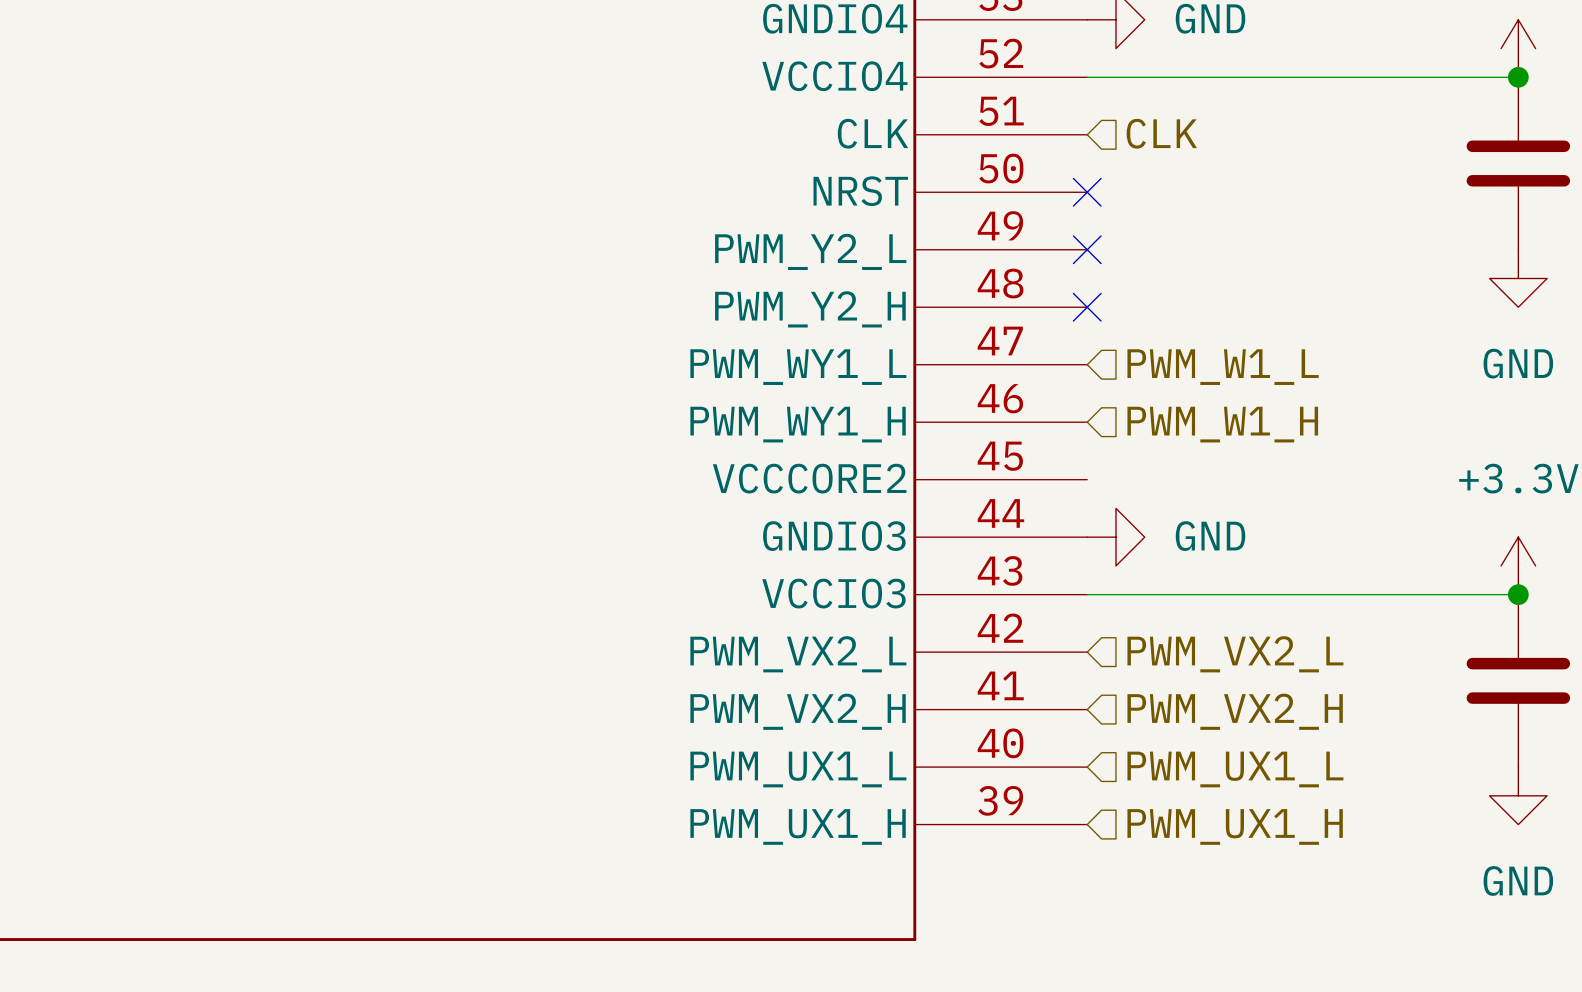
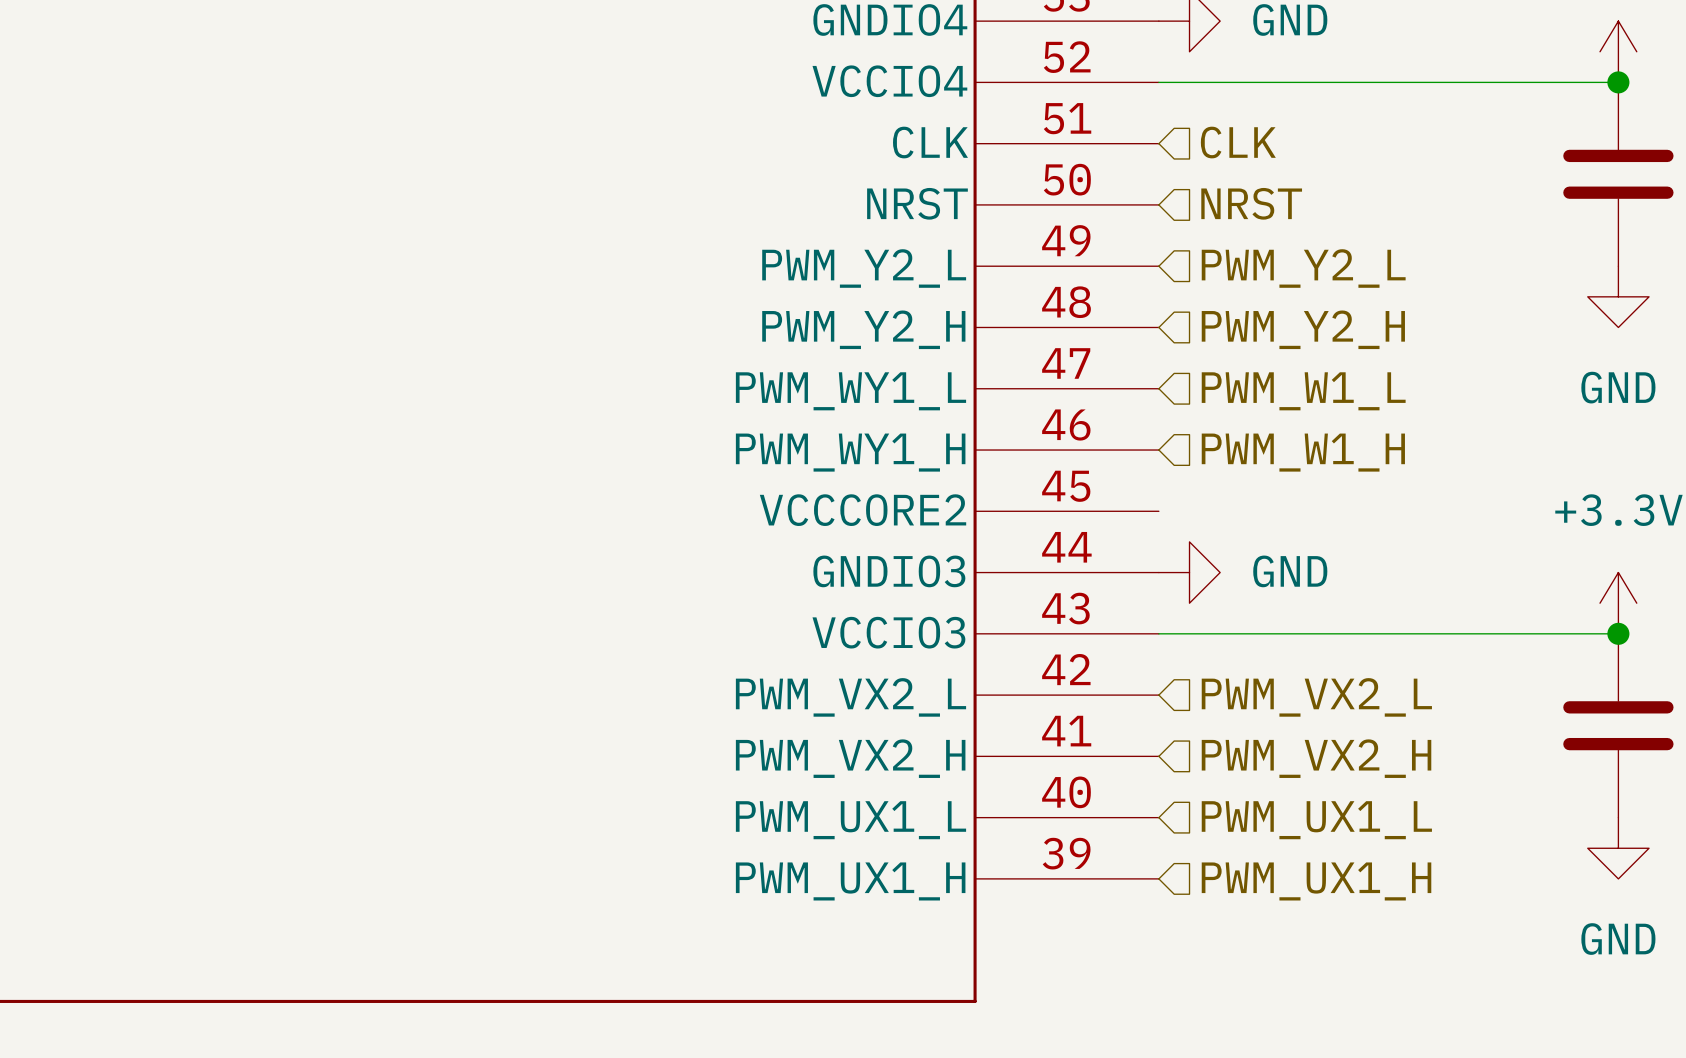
hierarchical label: none -> NRST (1251, 203)
no-connect mark: (1087, 192) -> none
no-connect mark: (1087, 249) -> none
hierarchical label: none -> PWM_Y2_L (1303, 268)
no-connect mark: (1087, 307) -> none
hierarchical label: none -> PWM_Y2_H (1303, 329)

